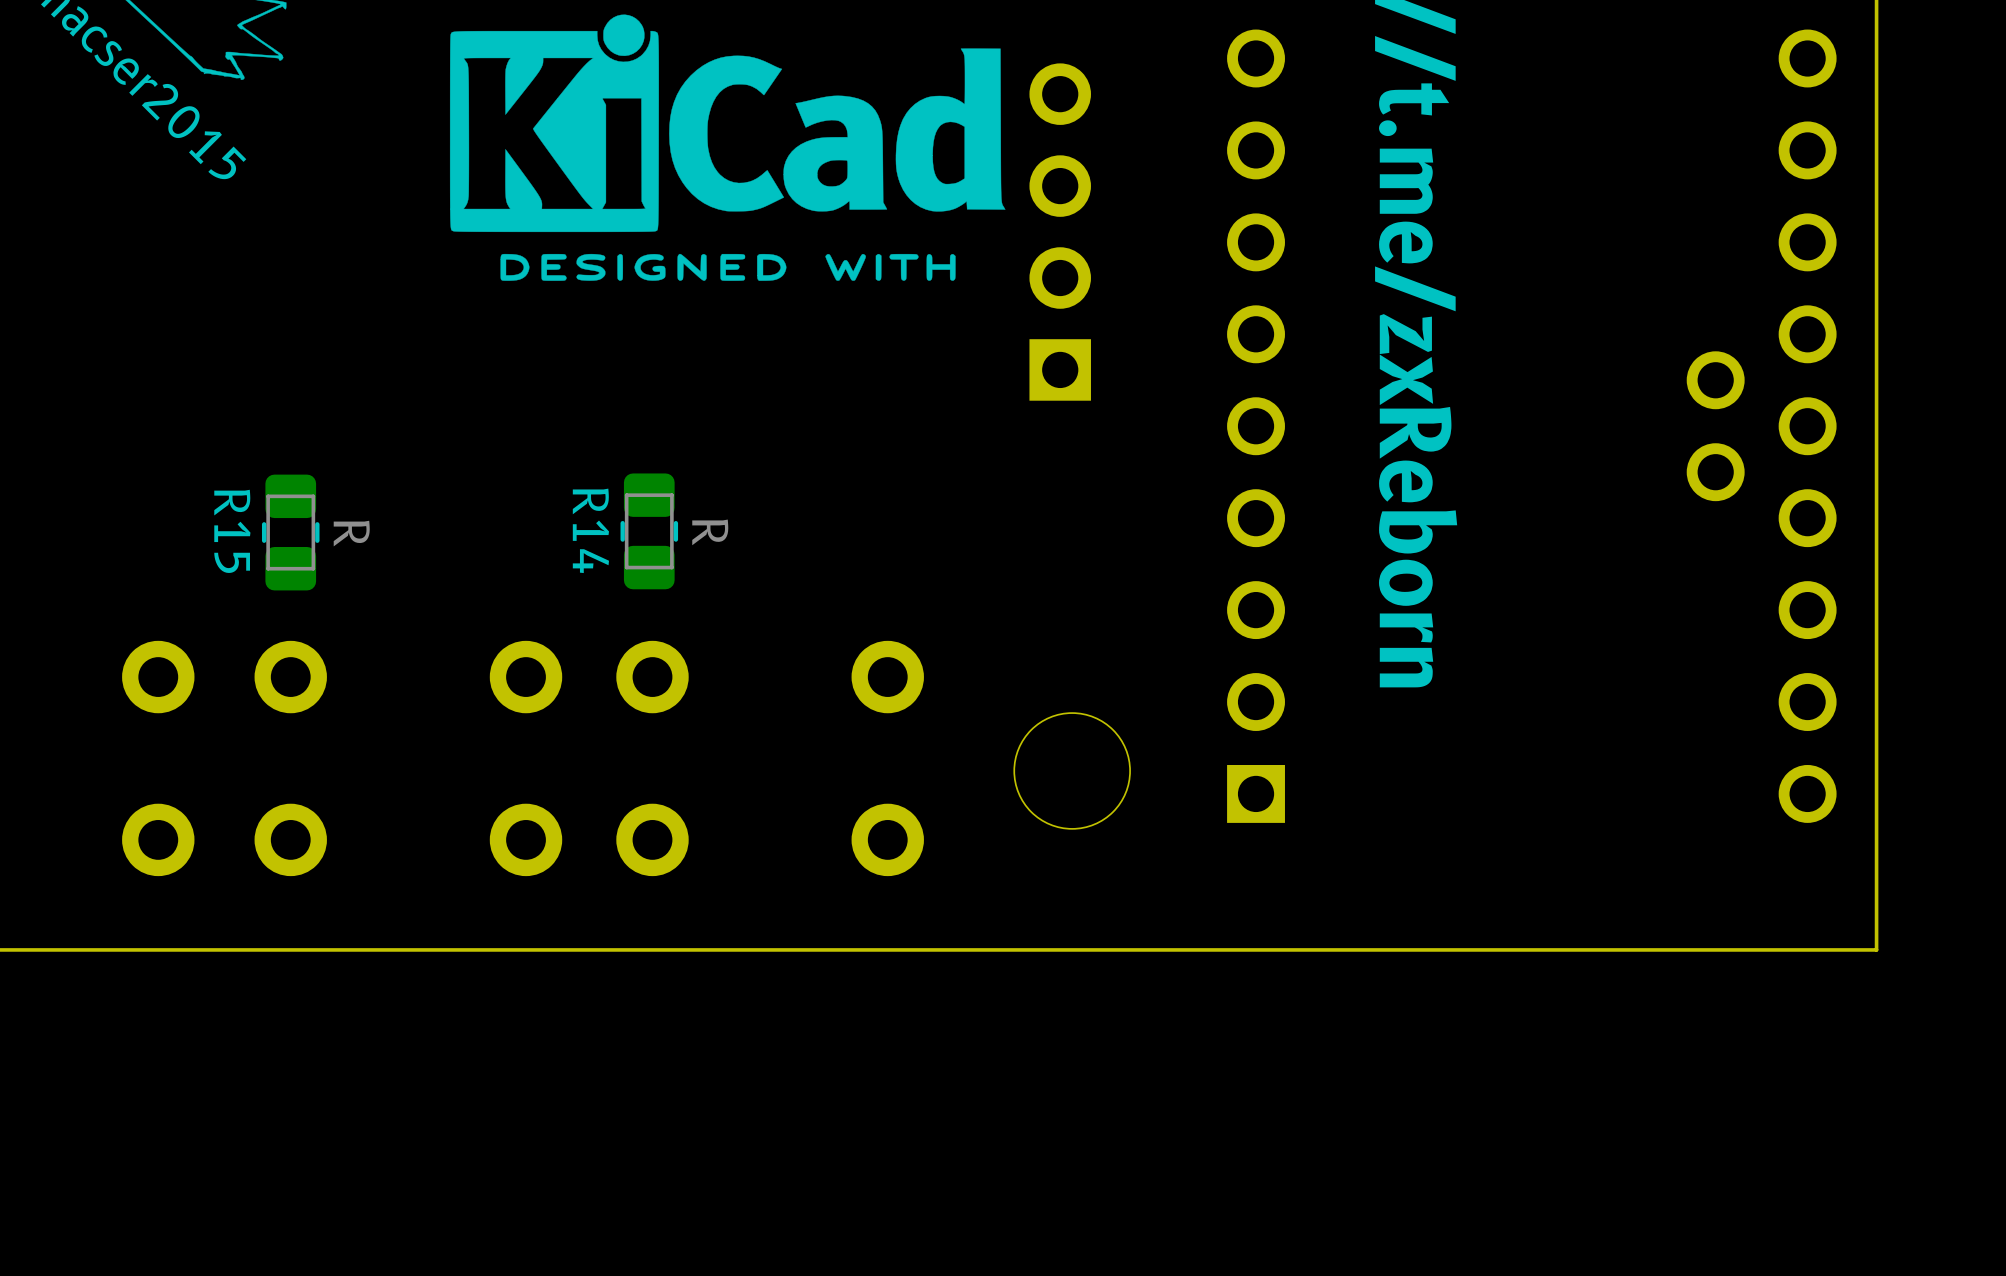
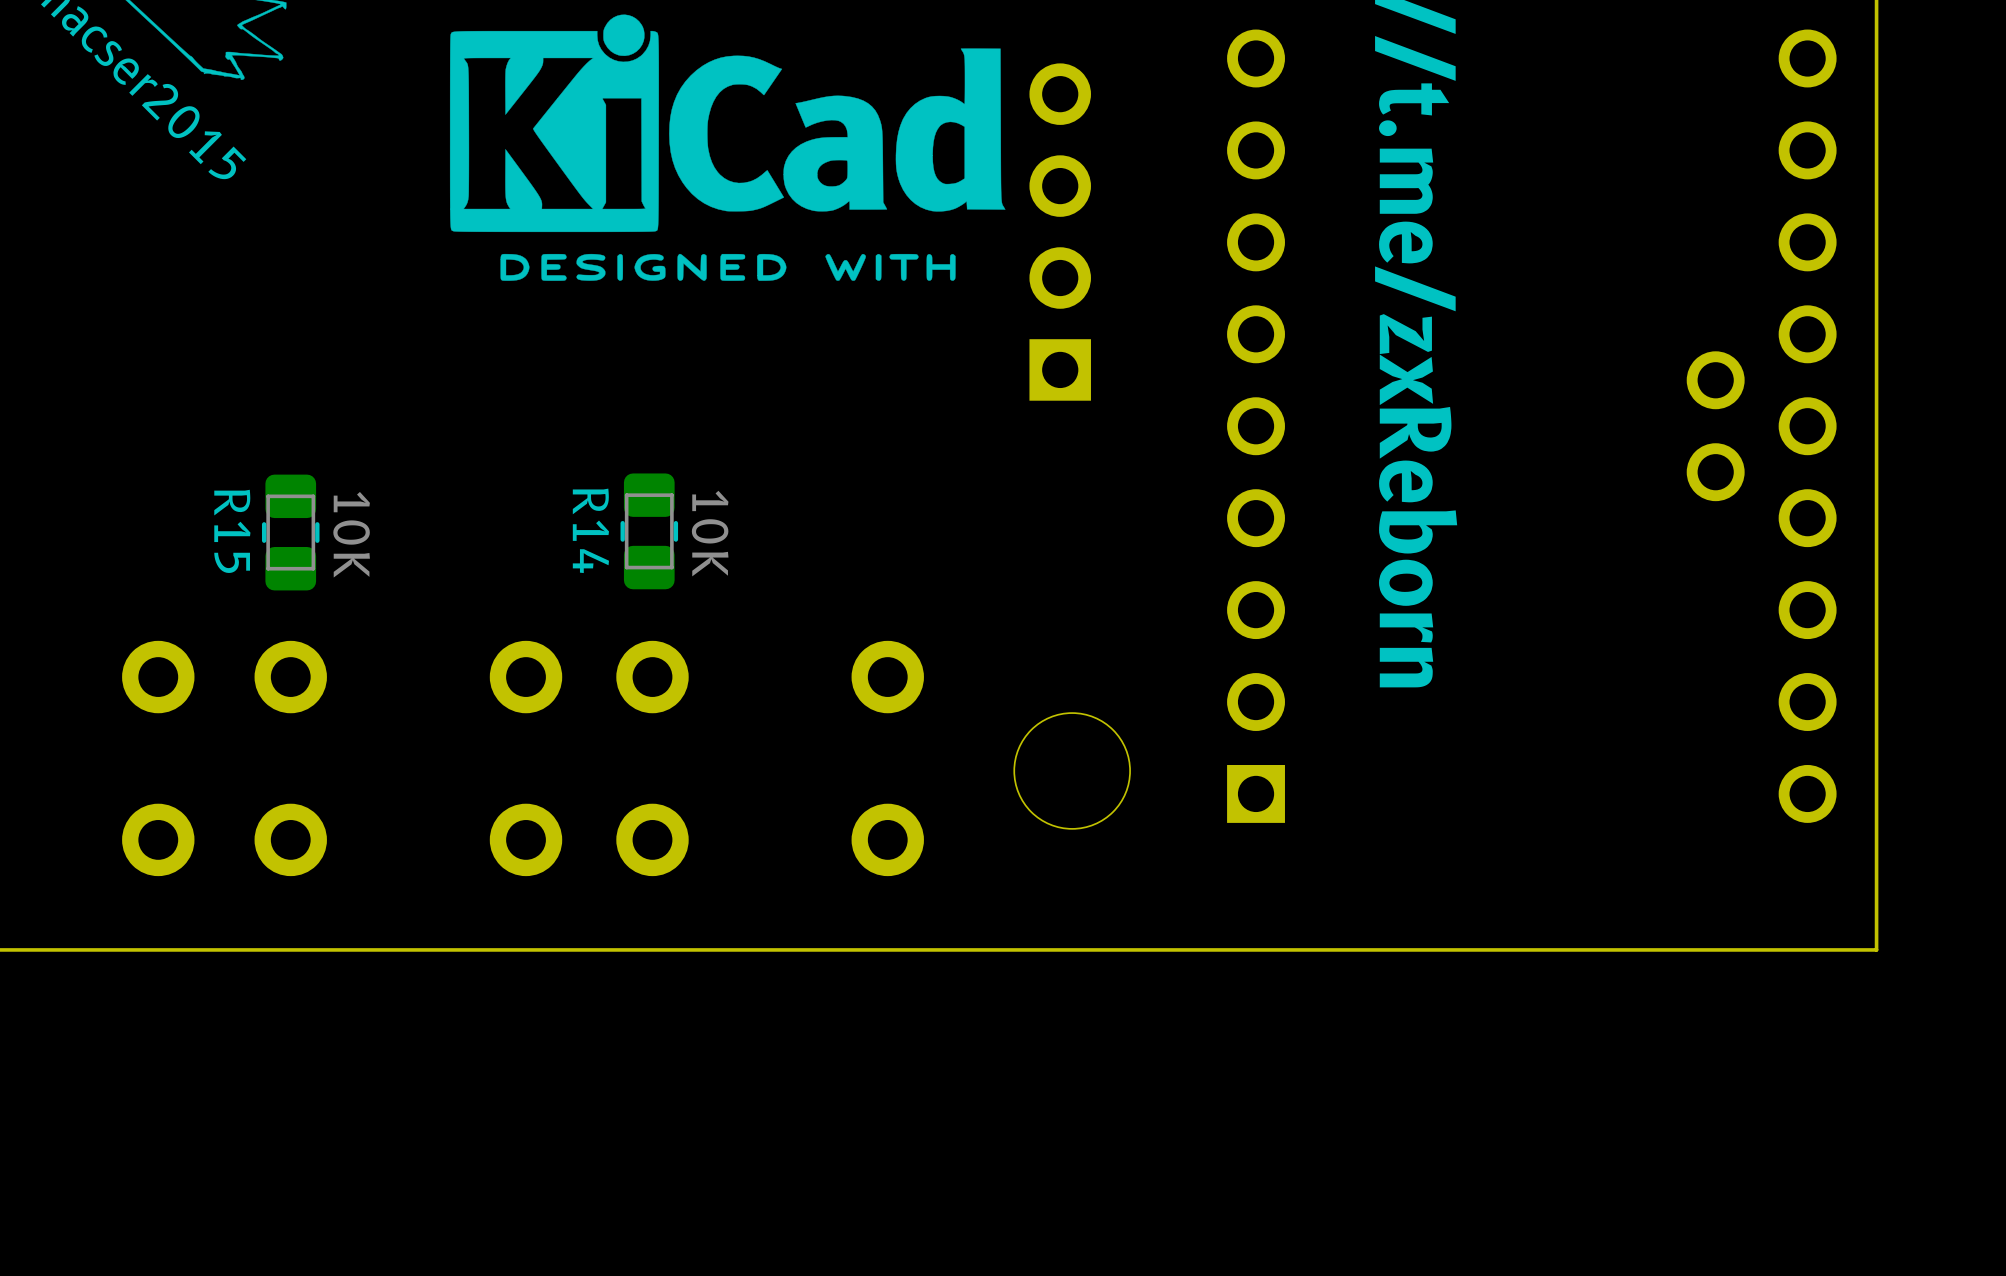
R14 value: R (710, 532) -> 10K (710, 533)
R15 value: R (351, 533) -> 10K (351, 534)

